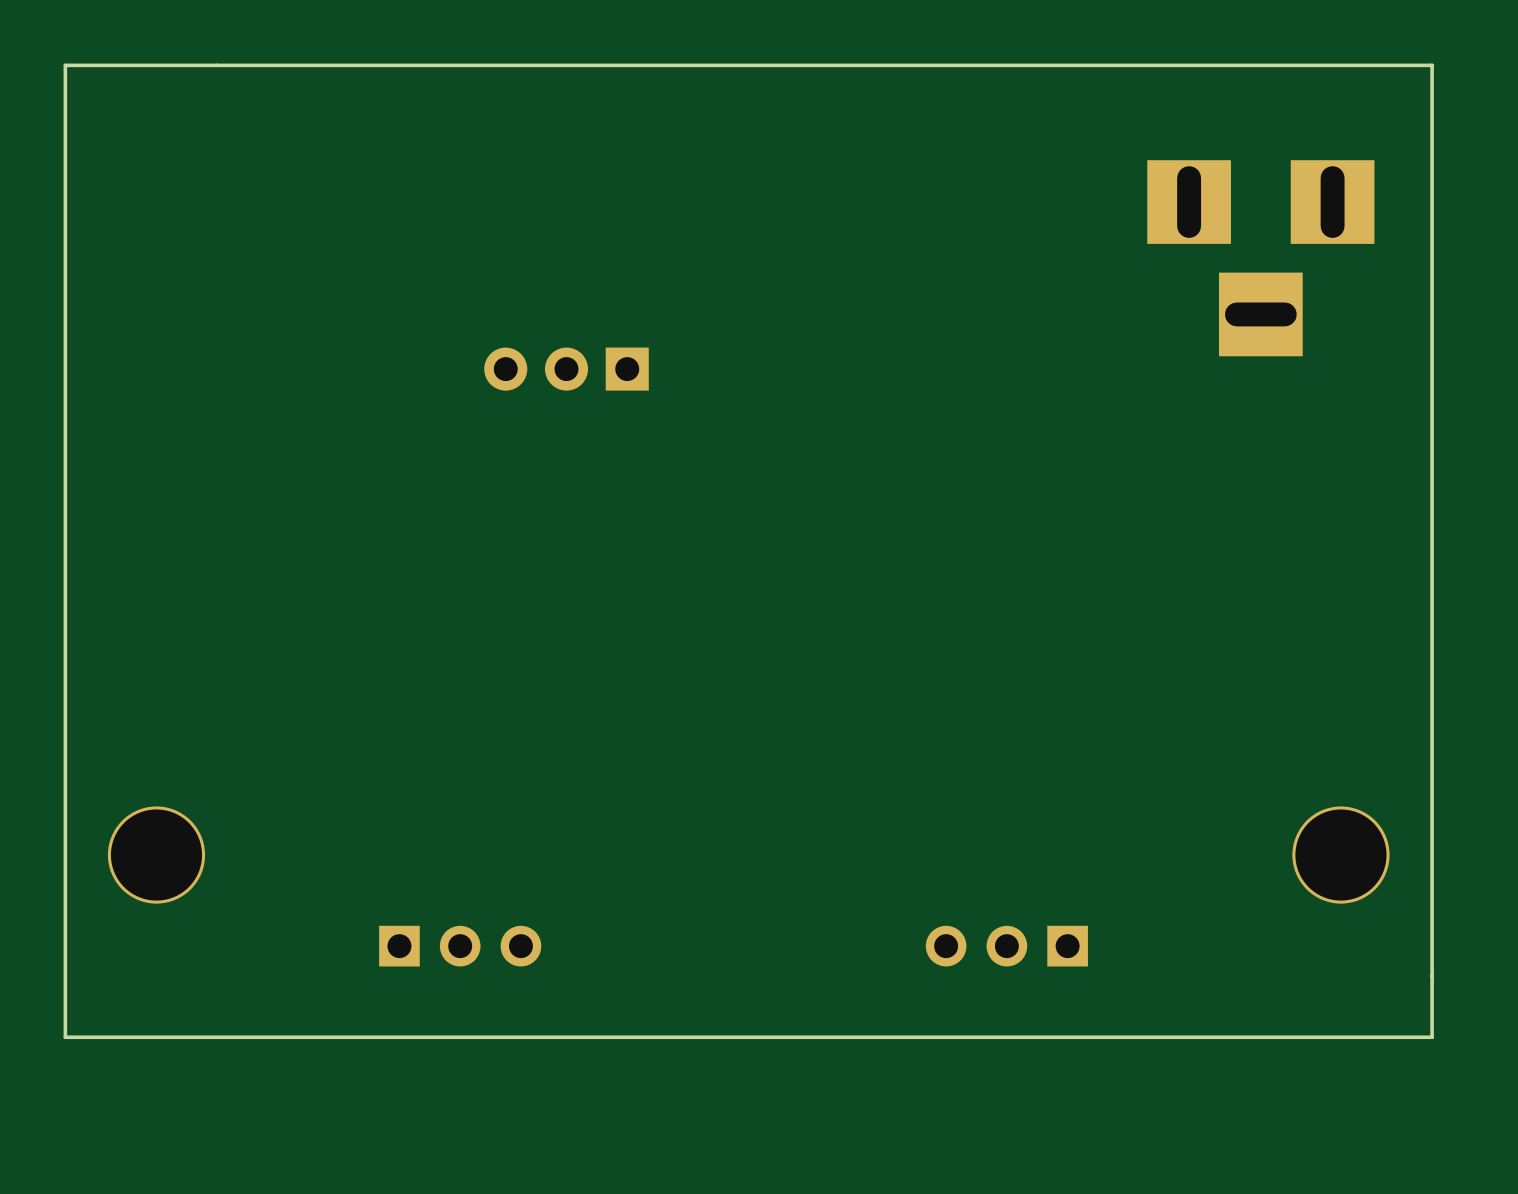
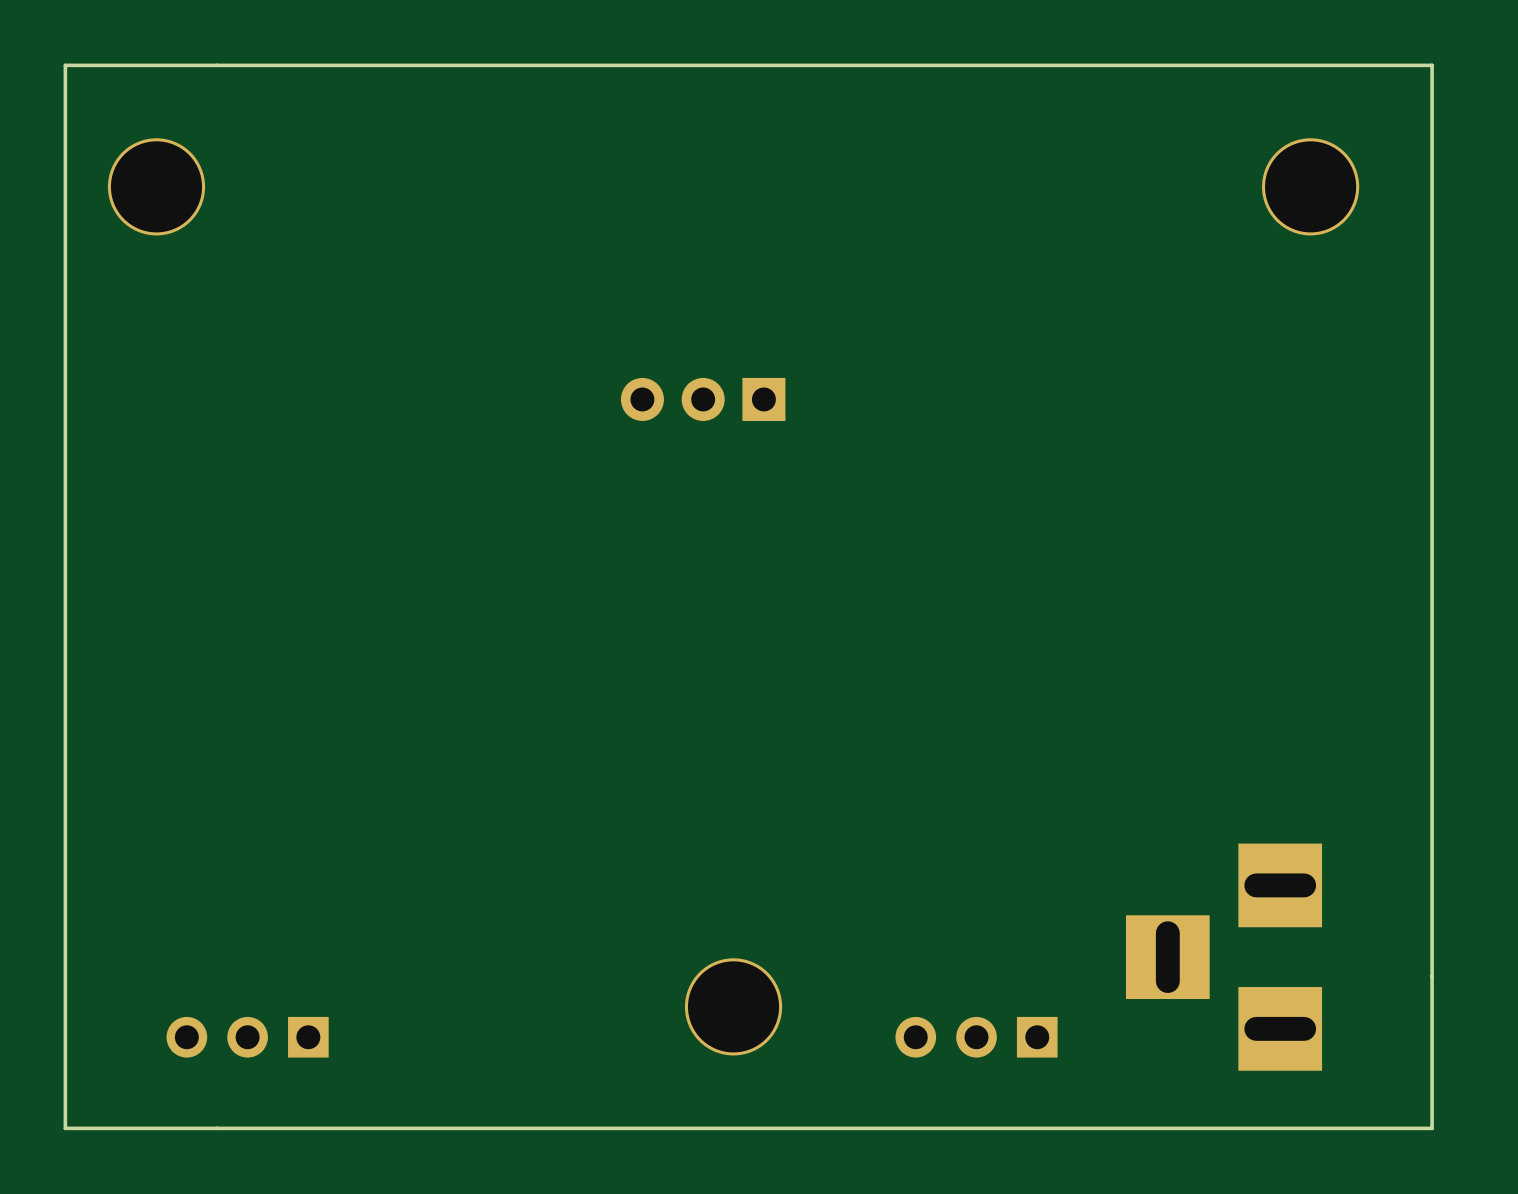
part: none -> (156, 186)
part: none -> (1310, 186)
part: (1260, 258) -> none
part position: (566, 369) -> (703, 399)
part: (156, 855) -> none
part: (1340, 855) -> none
part rotation: 0° (460, 946) -> 180° (247, 1037)
part position: (460, 946) -> (247, 1037)
part position: (1006, 946) -> (976, 1037)
part: none -> (1224, 957)
part: none -> (733, 1006)
board edge: (1432, 1037) (65, 1037) -> (1432, 1037) (1432, 1128) (65, 1128) (65, 1037)

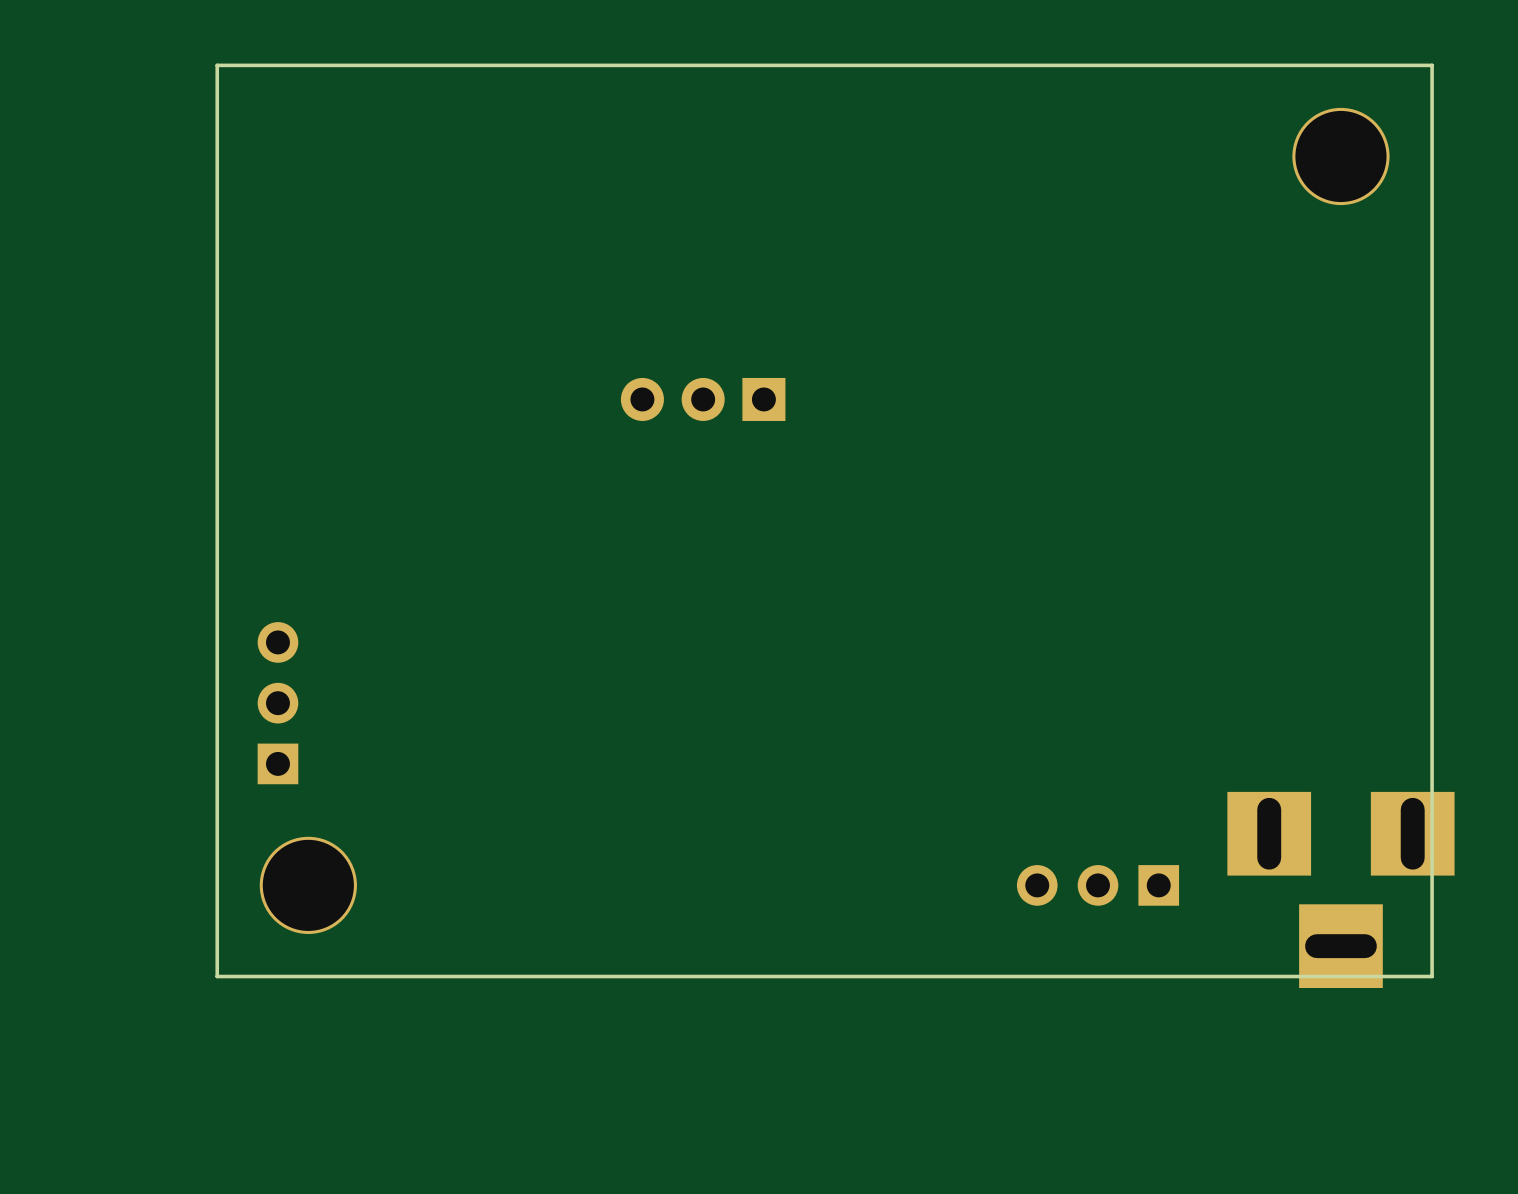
board edge: (217, 65) (65, 65) (65, 1128) (1432, 1128) (1432, 976) -> (217, 65) (217, 976) (1432, 976)
part: (156, 186) -> none
part position: (1310, 186) -> (1340, 156)
part: none -> (308, 885)
part rotation: 0° (1224, 957) -> 90° counterclockwise (1340, 889)
part: (733, 1006) -> none
part rotation: 0° (247, 1037) -> 90° clockwise (277, 703)
part position: (247, 1037) -> (277, 703)
part position: (976, 1037) -> (1098, 885)

